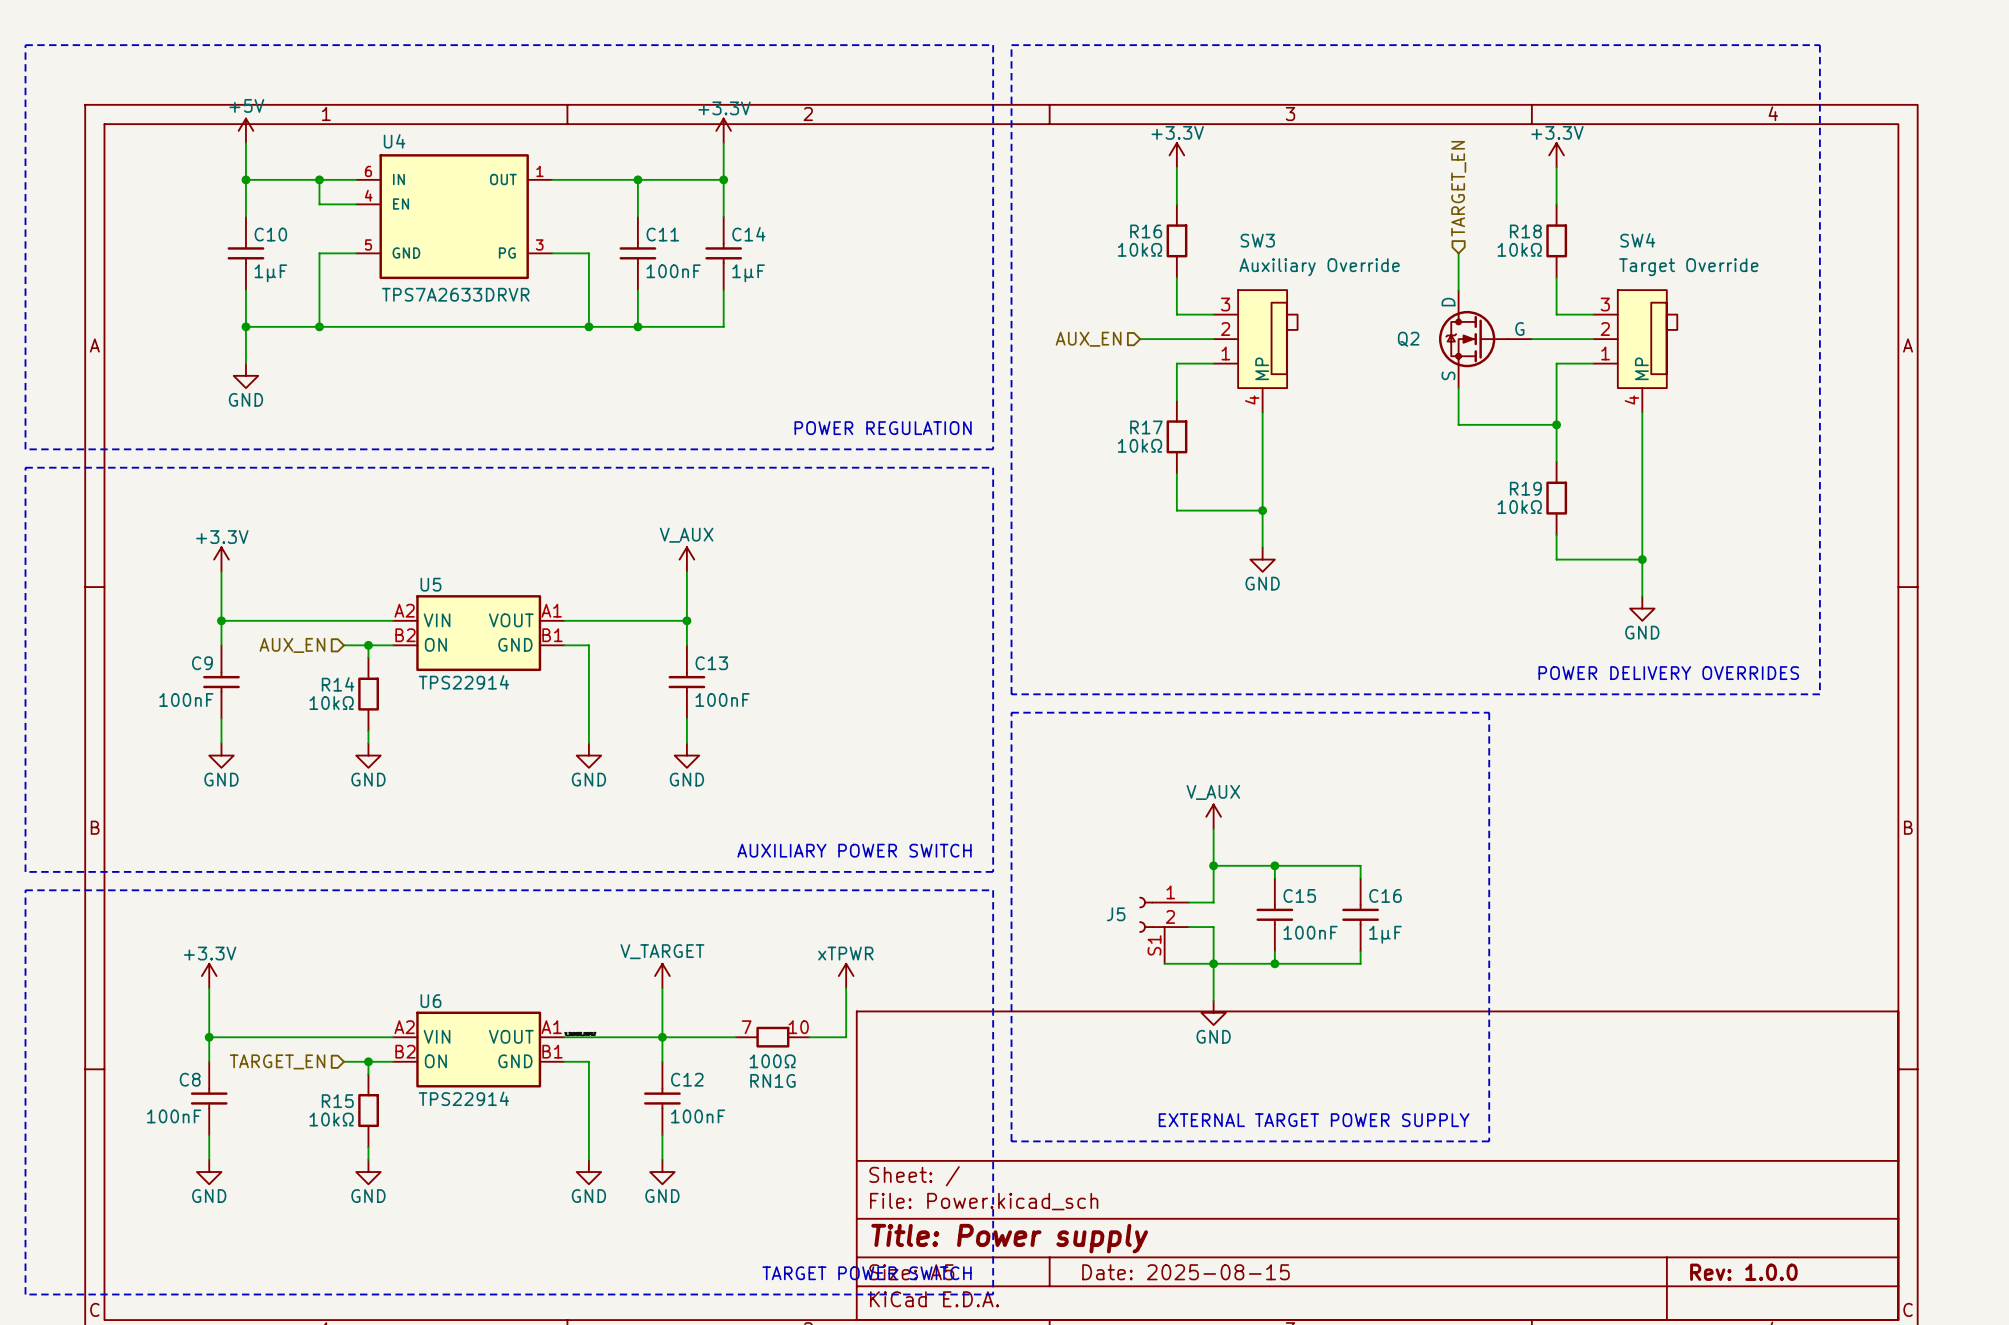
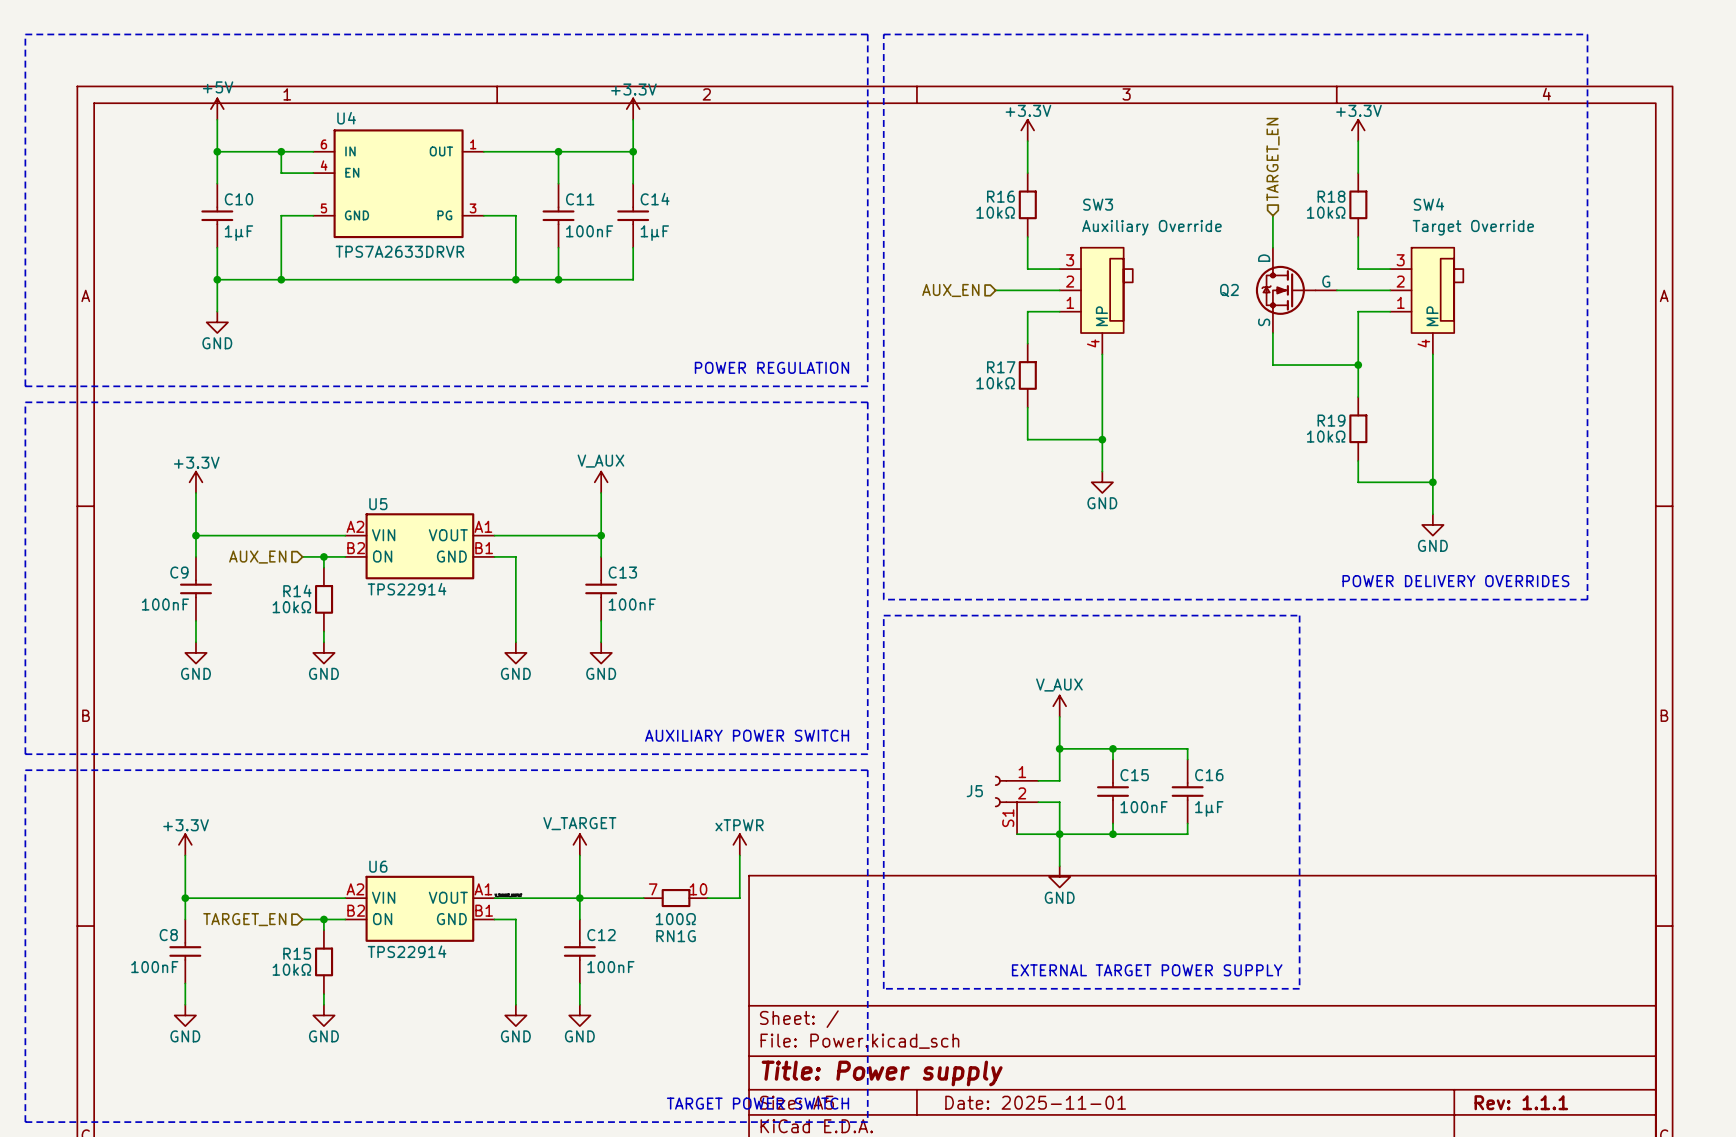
title block: Date: 2025-08-15 (1185, 1272) -> Date: 2025-11-01 (1035, 1102)
title block: Rev: 1.0.0 (1743, 1272) -> Rev: 1.1.1 (1521, 1102)

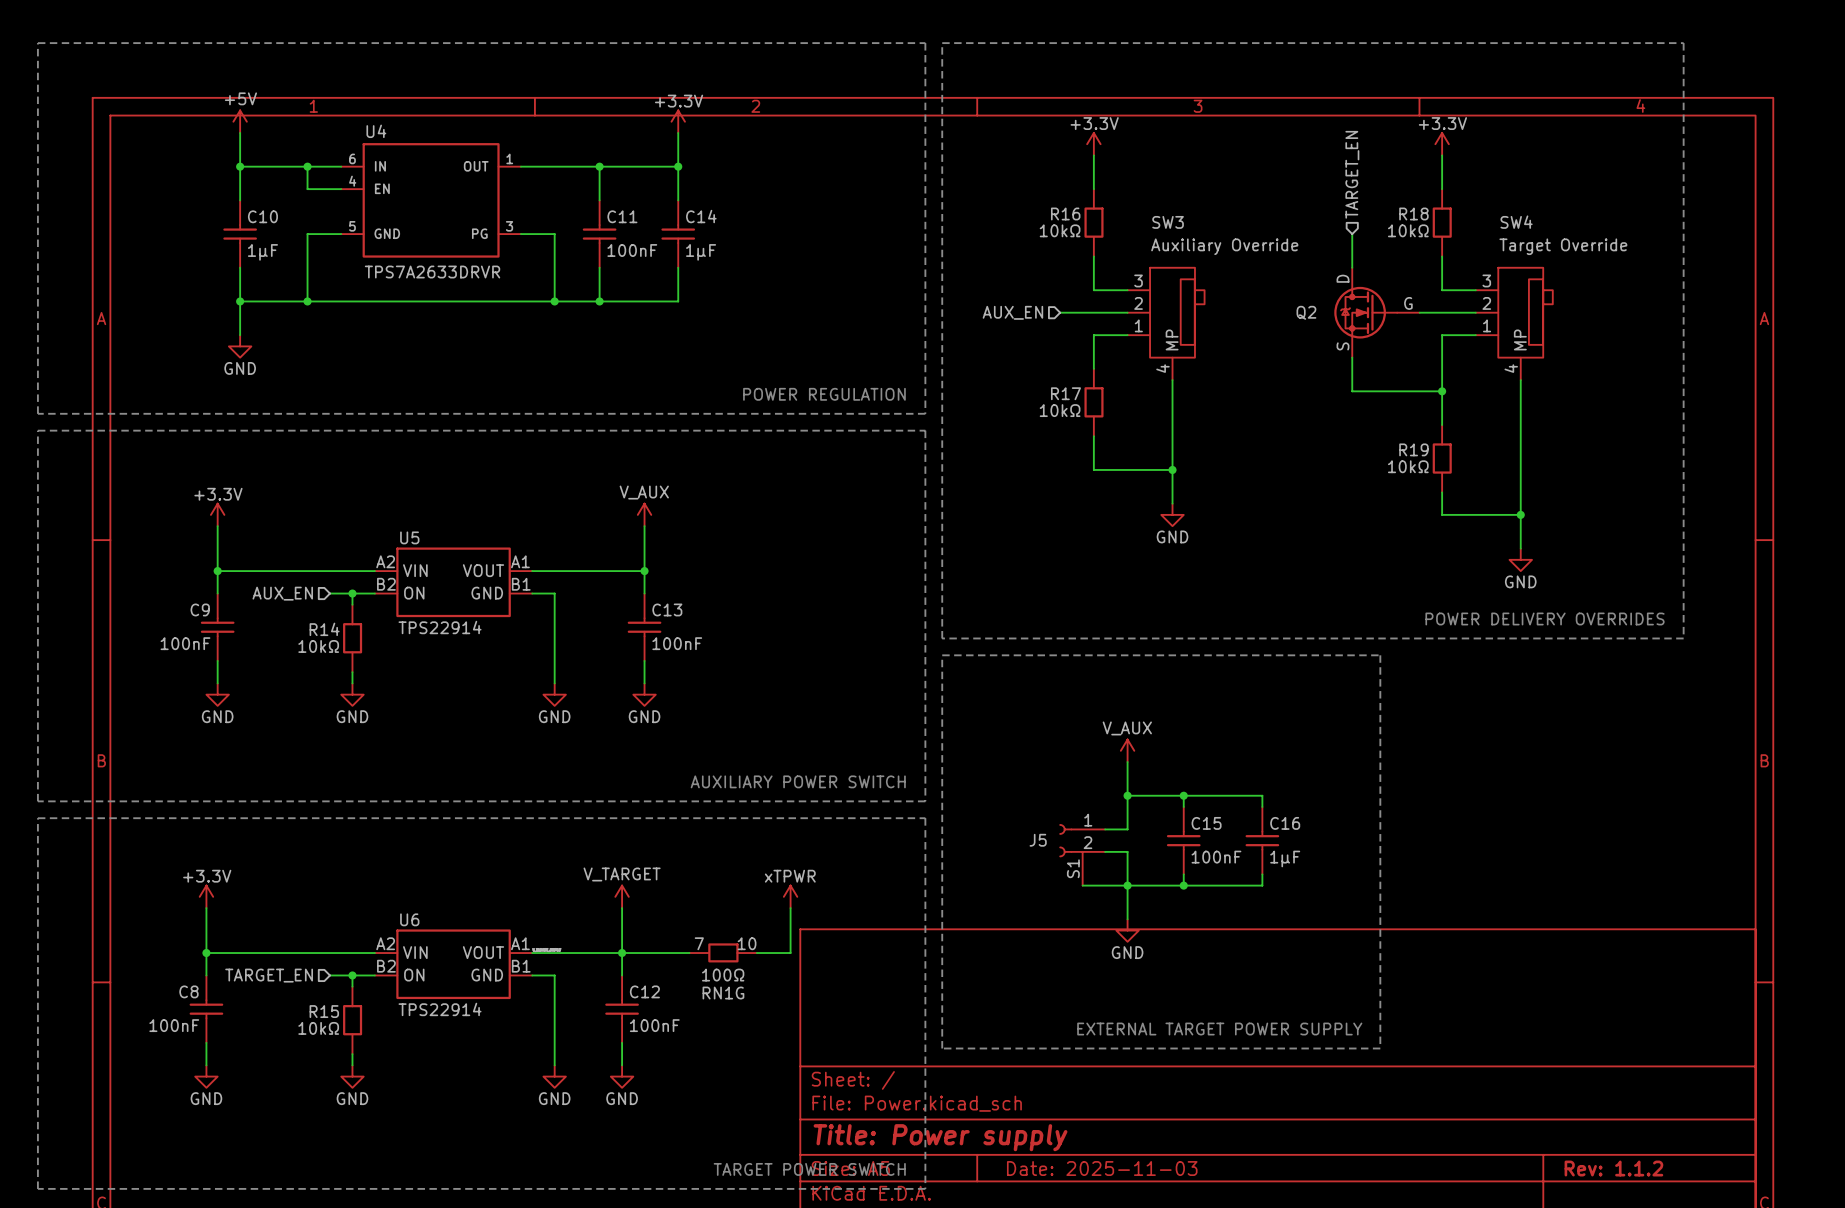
title block: Date: 2025-11-01 (1035, 1102) -> Date: 2025-11-03 (1102, 1168)
title block: Rev: 1.1.1 (1521, 1102) -> Rev: 1.1.2 (1613, 1168)

